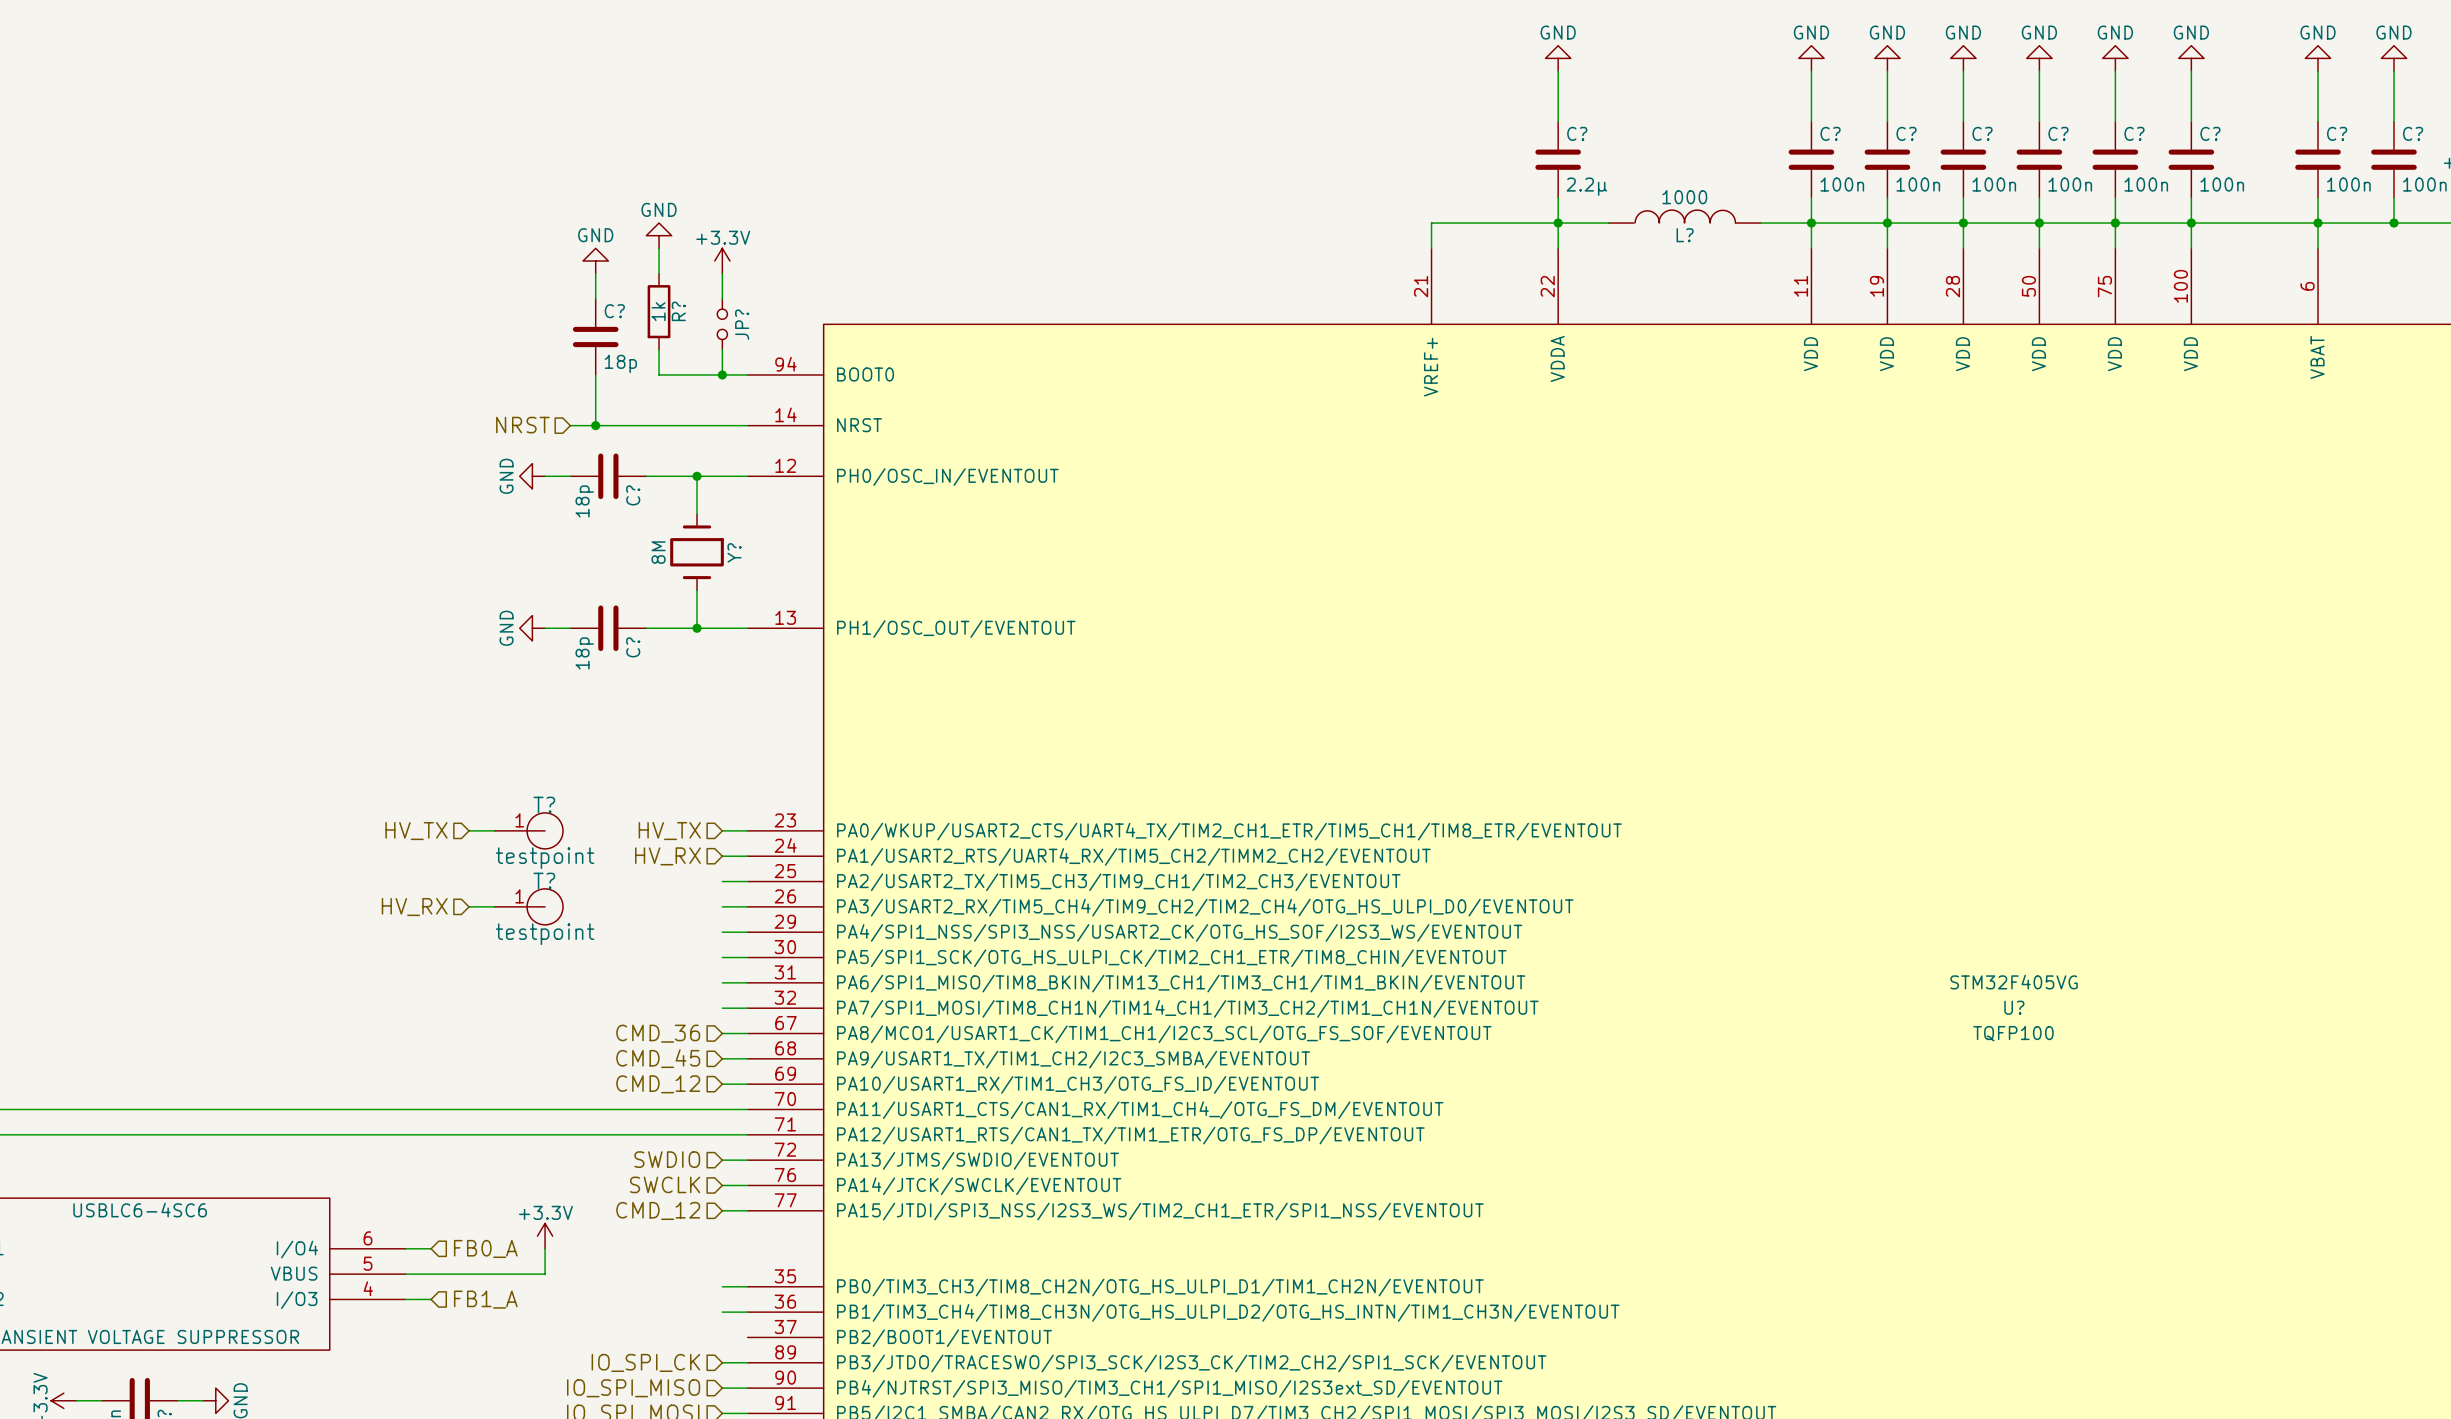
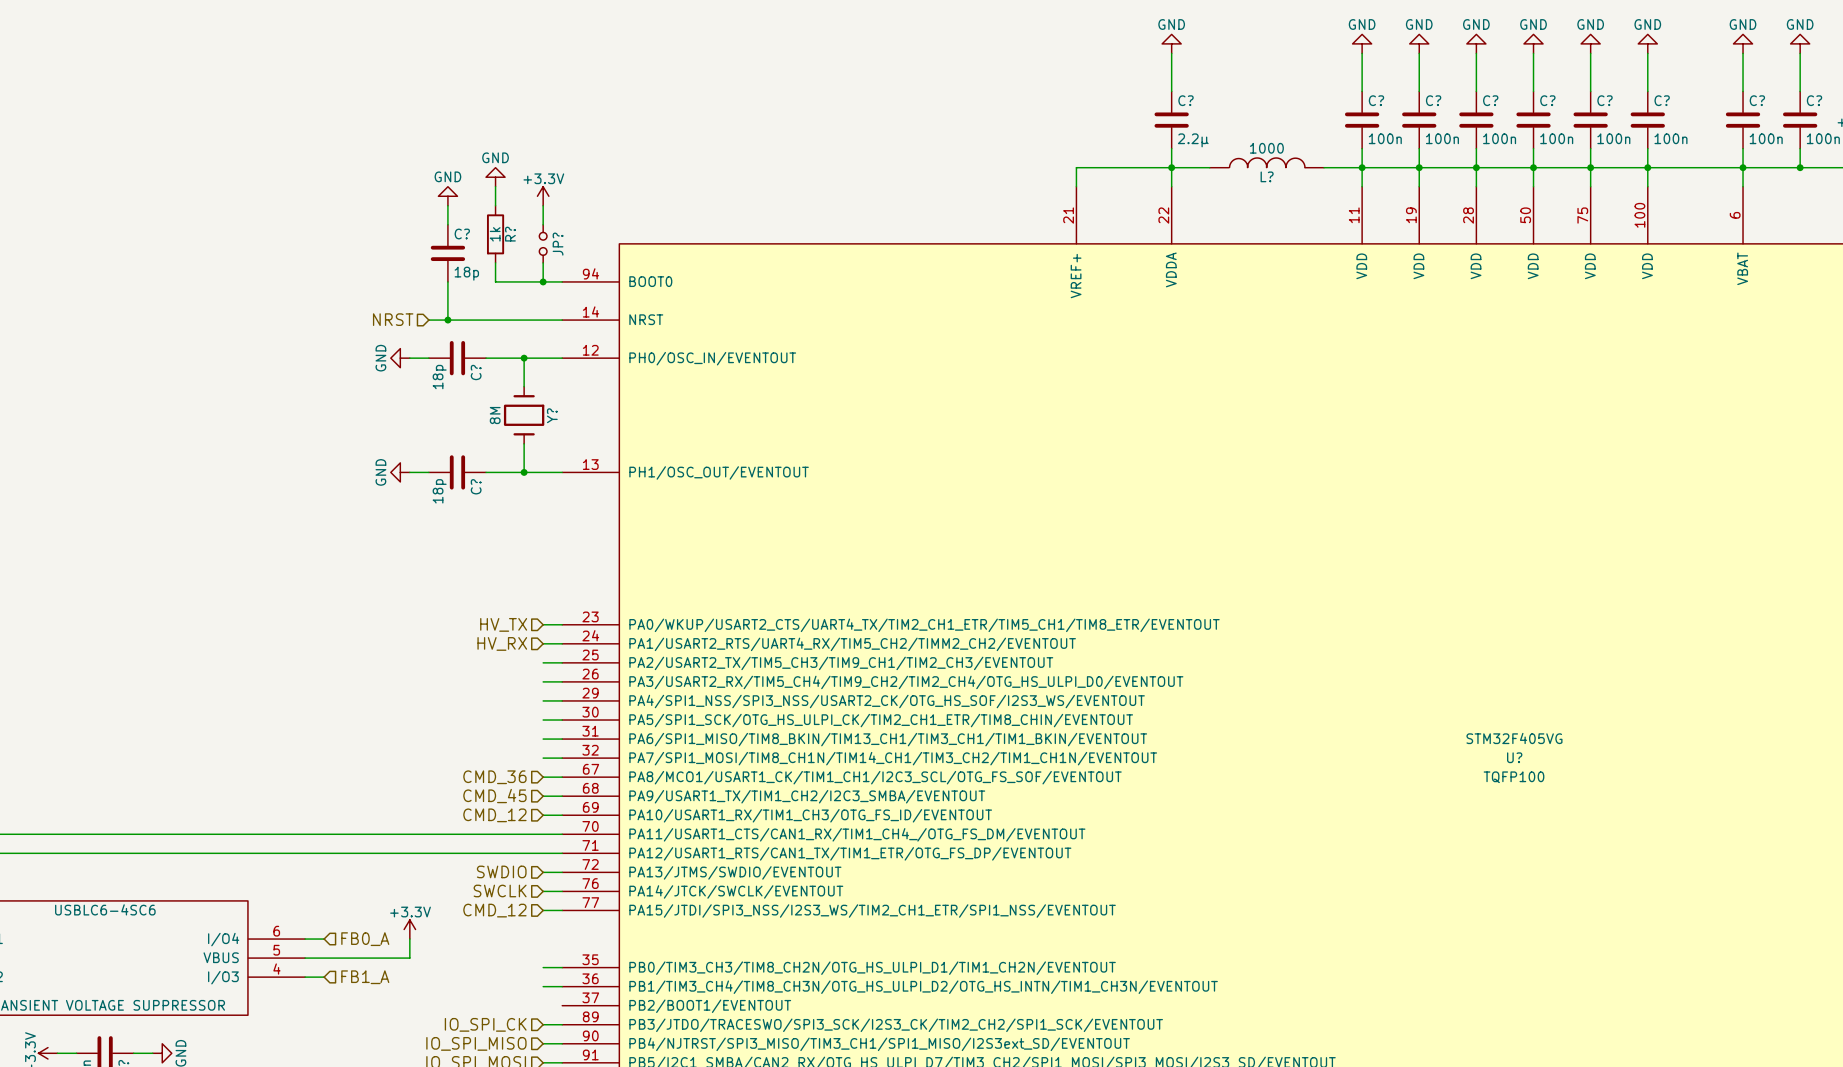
wire: (469, 830) (494, 830) -> none
T?: testpoint (528, 830) -> none
hierarchical label: HV_TX (416, 831) -> none
wire: (469, 906) (494, 906) -> none
T?: testpoint (528, 906) -> none
hierarchical label: HV_RX (414, 907) -> none

